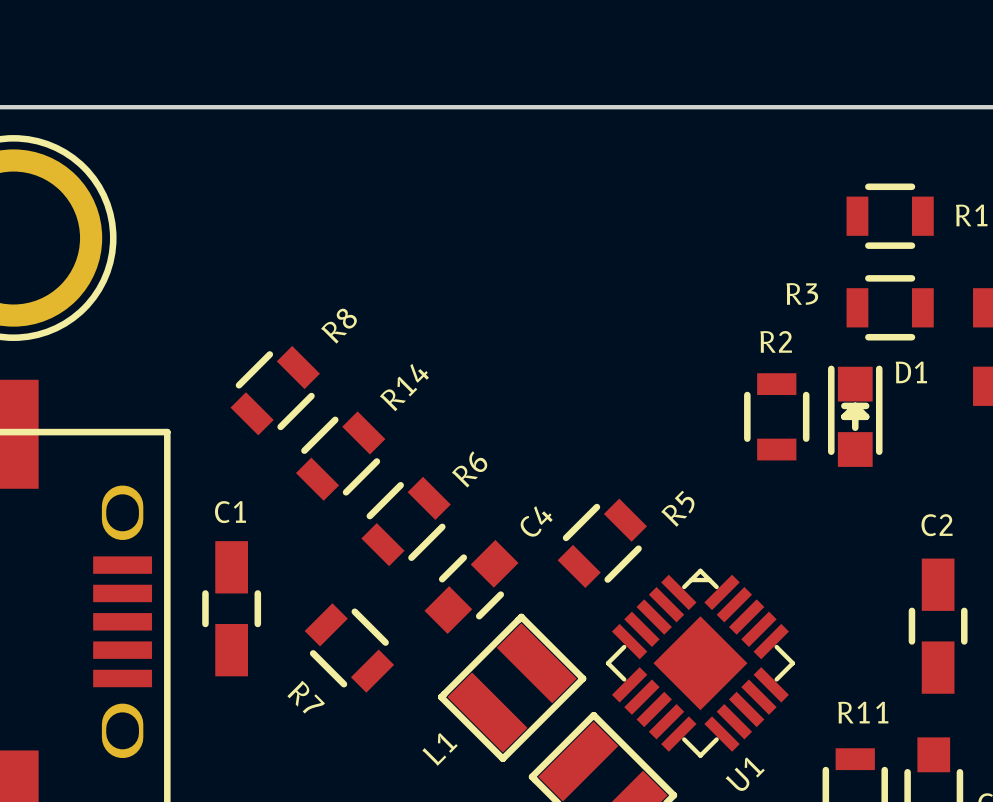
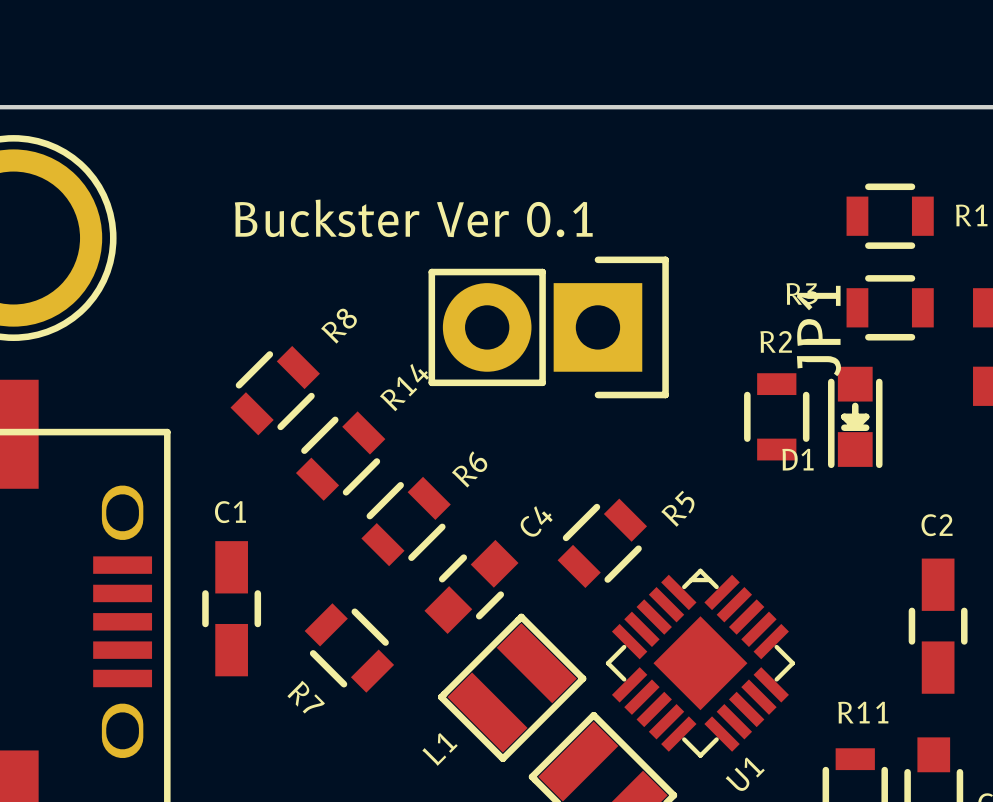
text: none -> Buckster Ver 0.1 (413, 218)
JP1: none -> (548, 327)
D1 rotation: 0° (855, 416) -> 180° (855, 417)

